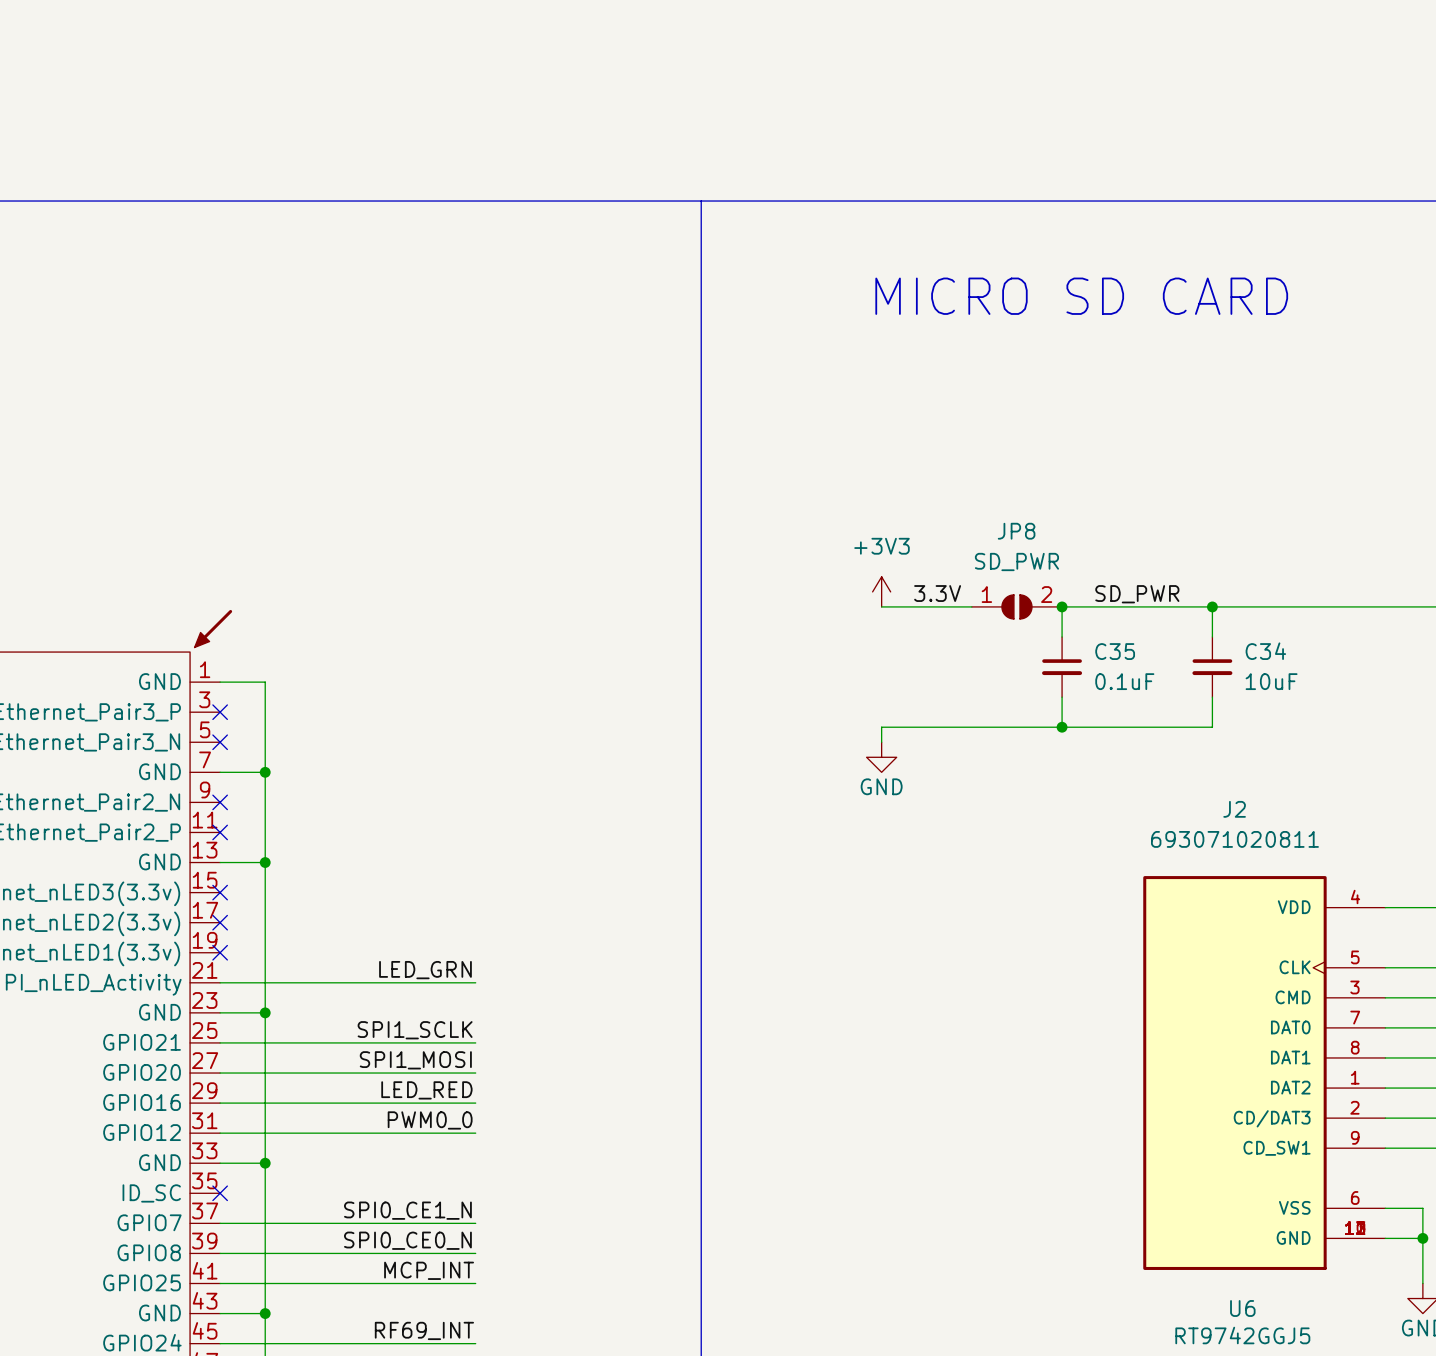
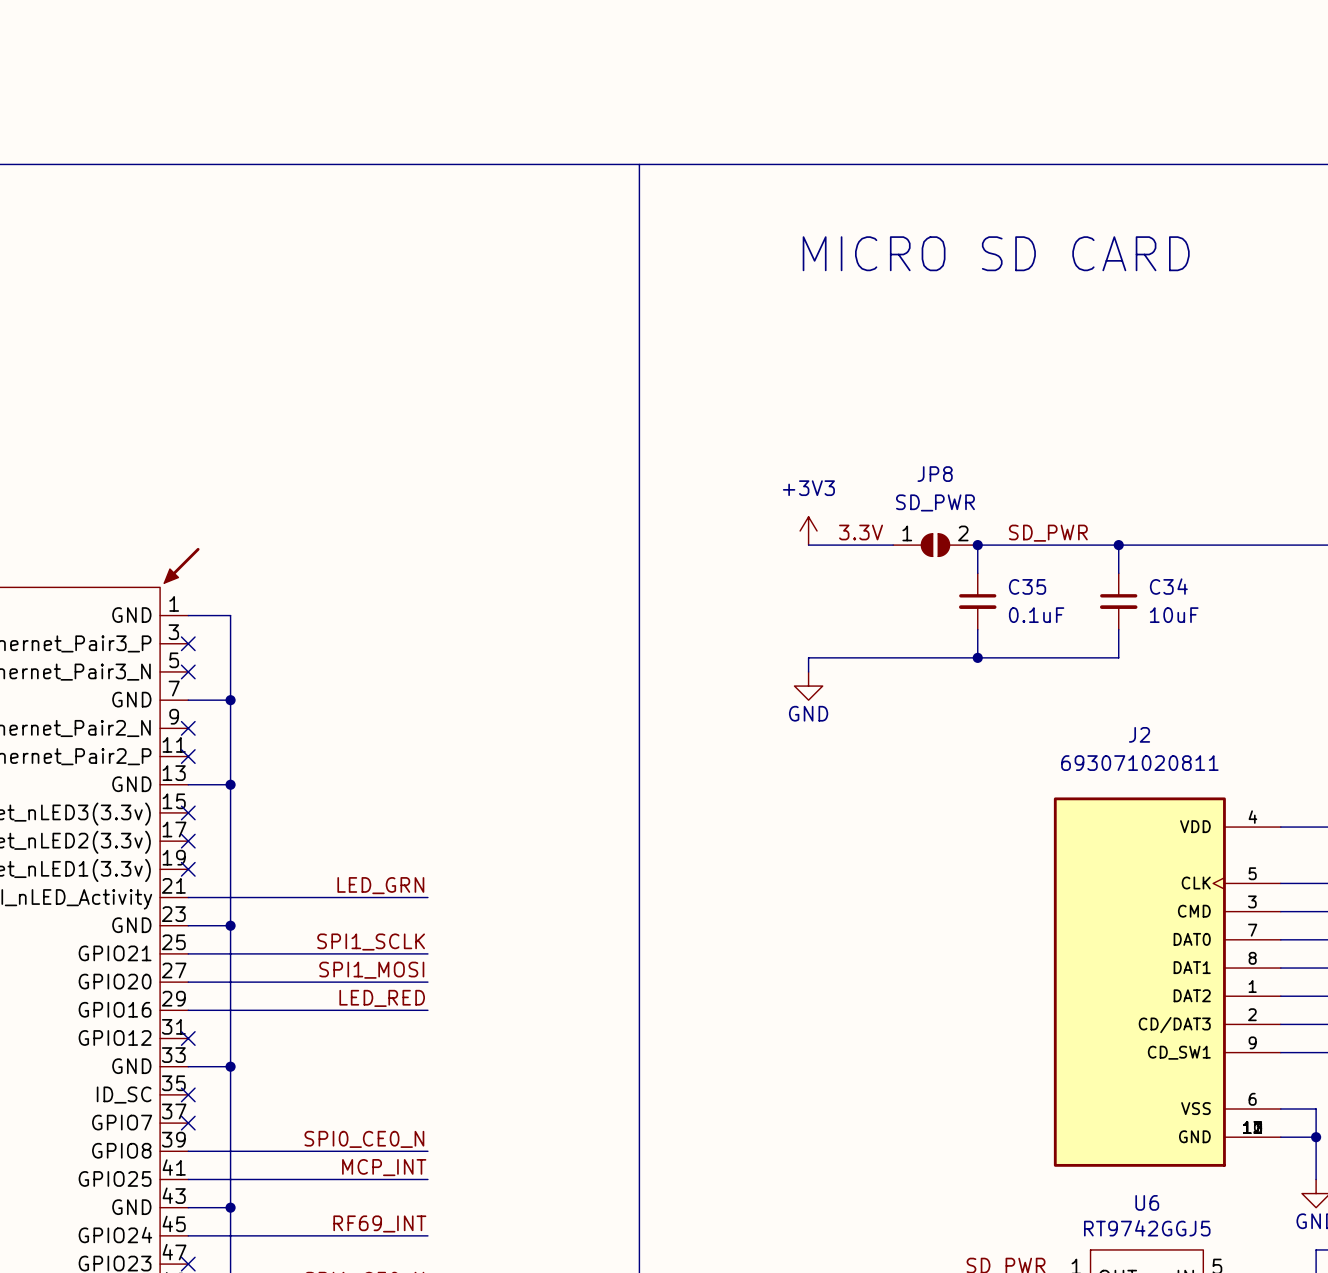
label: PWM0_0 (430, 1120) -> none
wire: (220, 1133) (475, 1133) -> none
no-connect mark: none -> (188, 1038)
label: SPI0_CE1_N (407, 1210) -> none
wire: (220, 1223) (475, 1223) -> none
no-connect mark: none -> (188, 1123)

